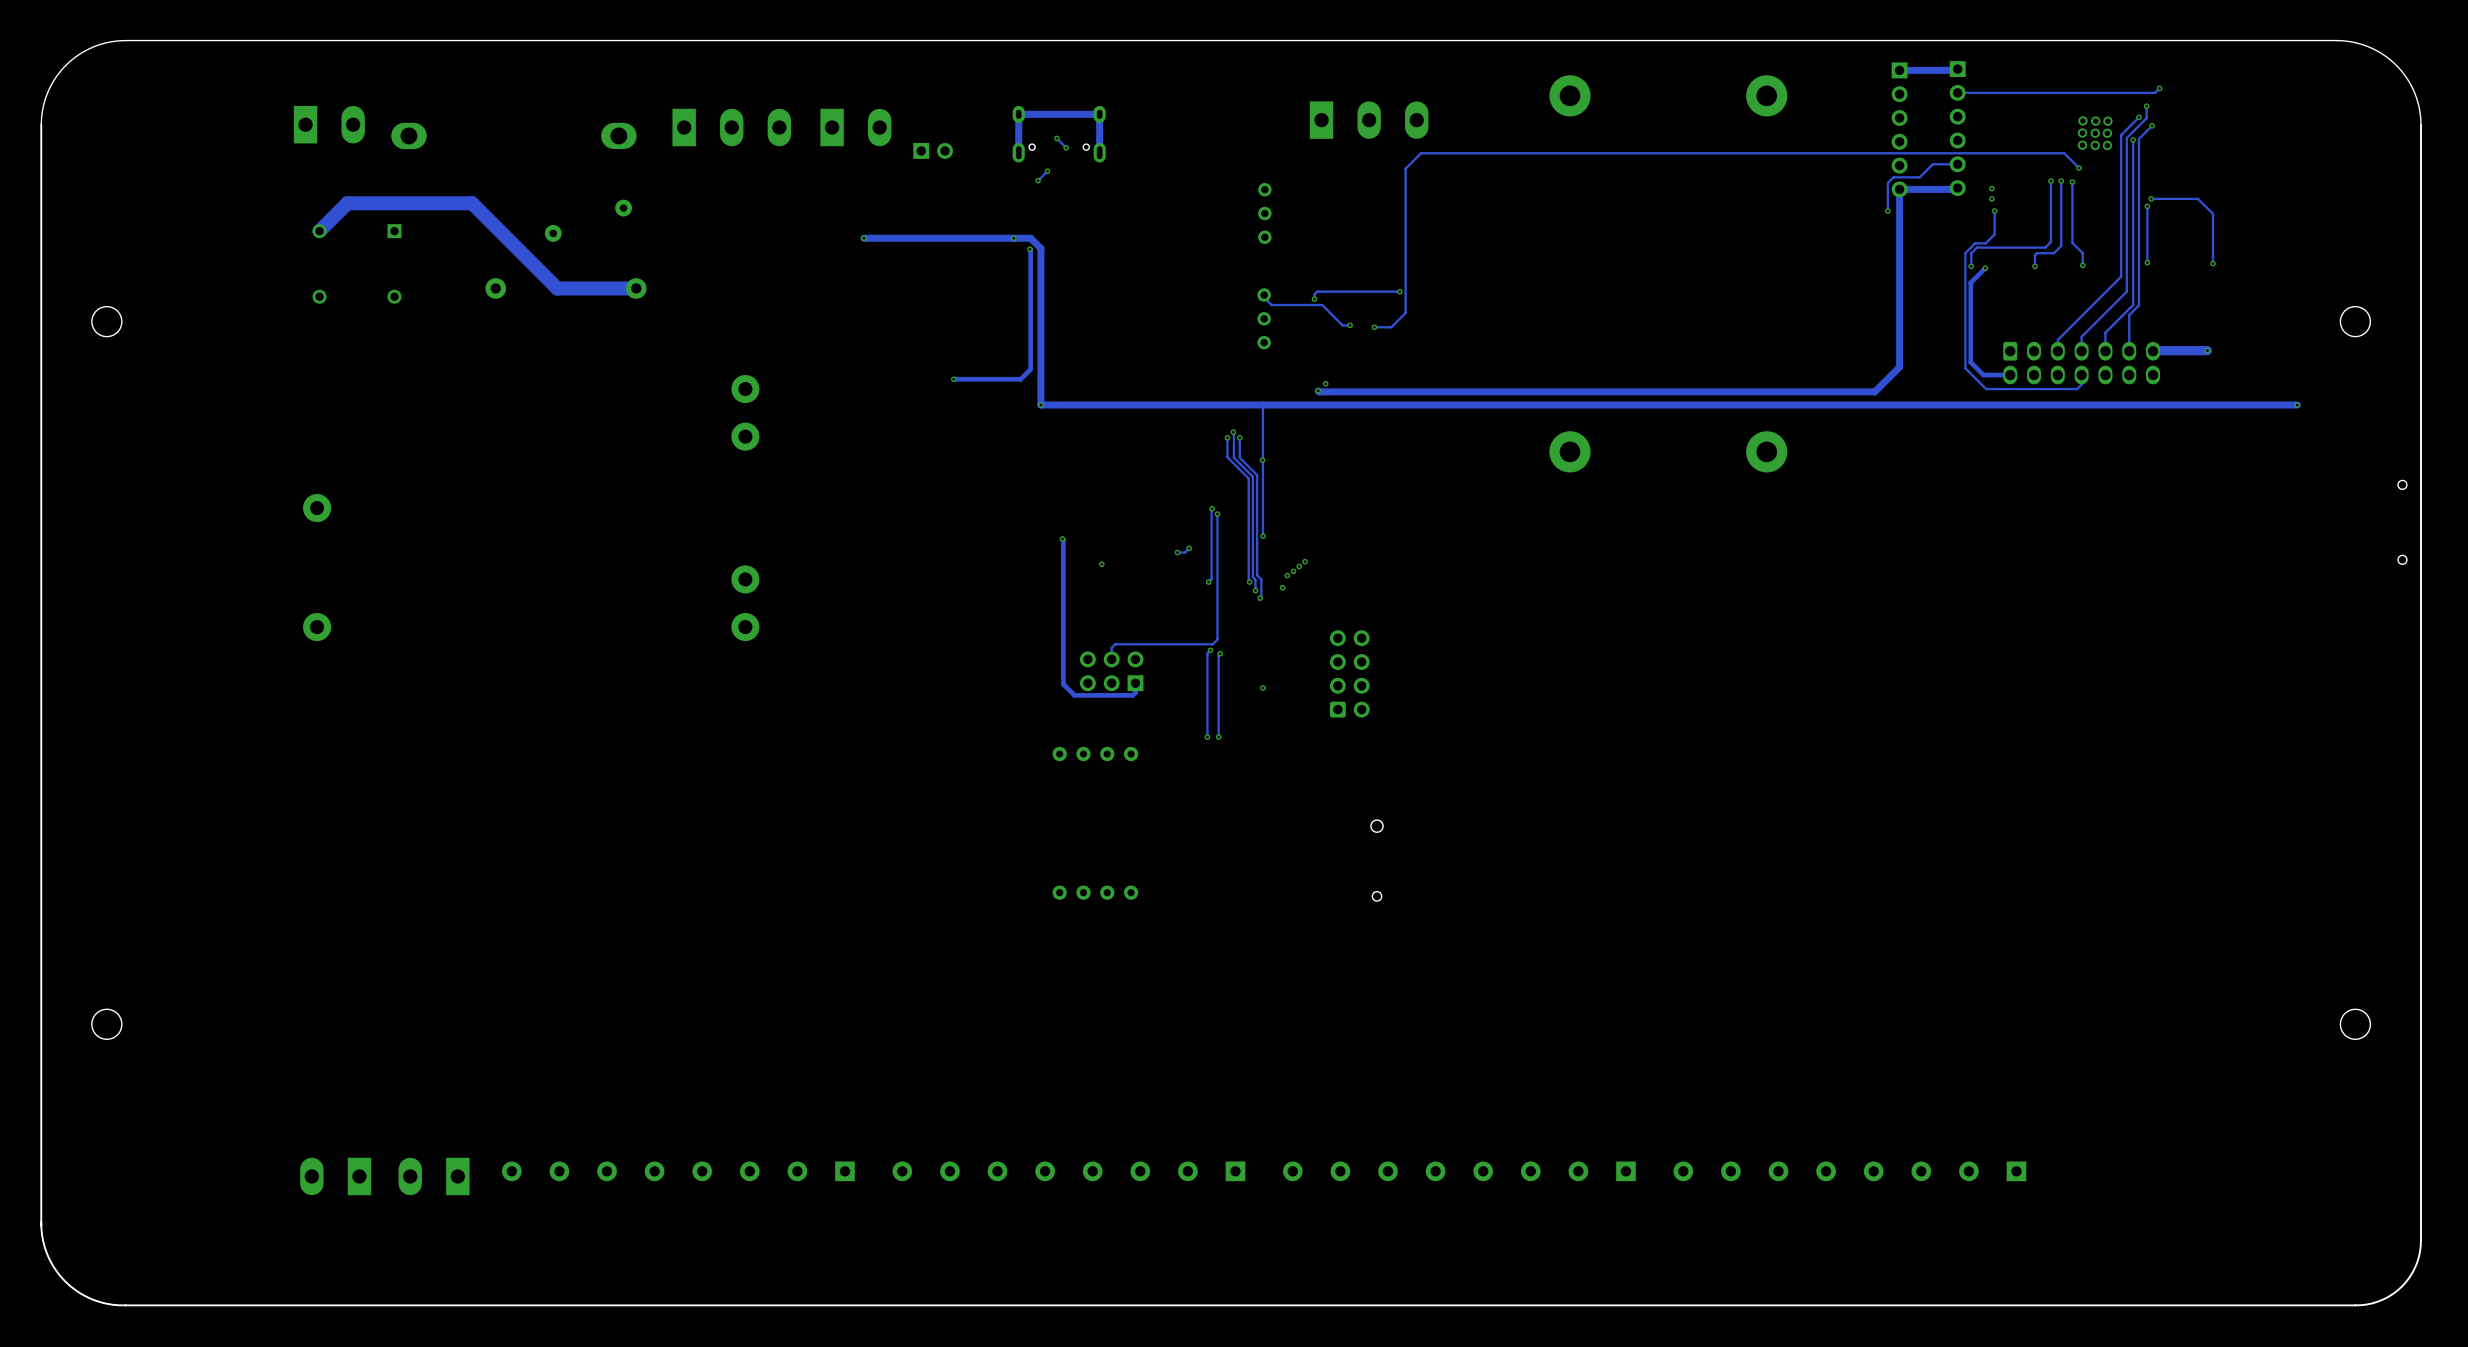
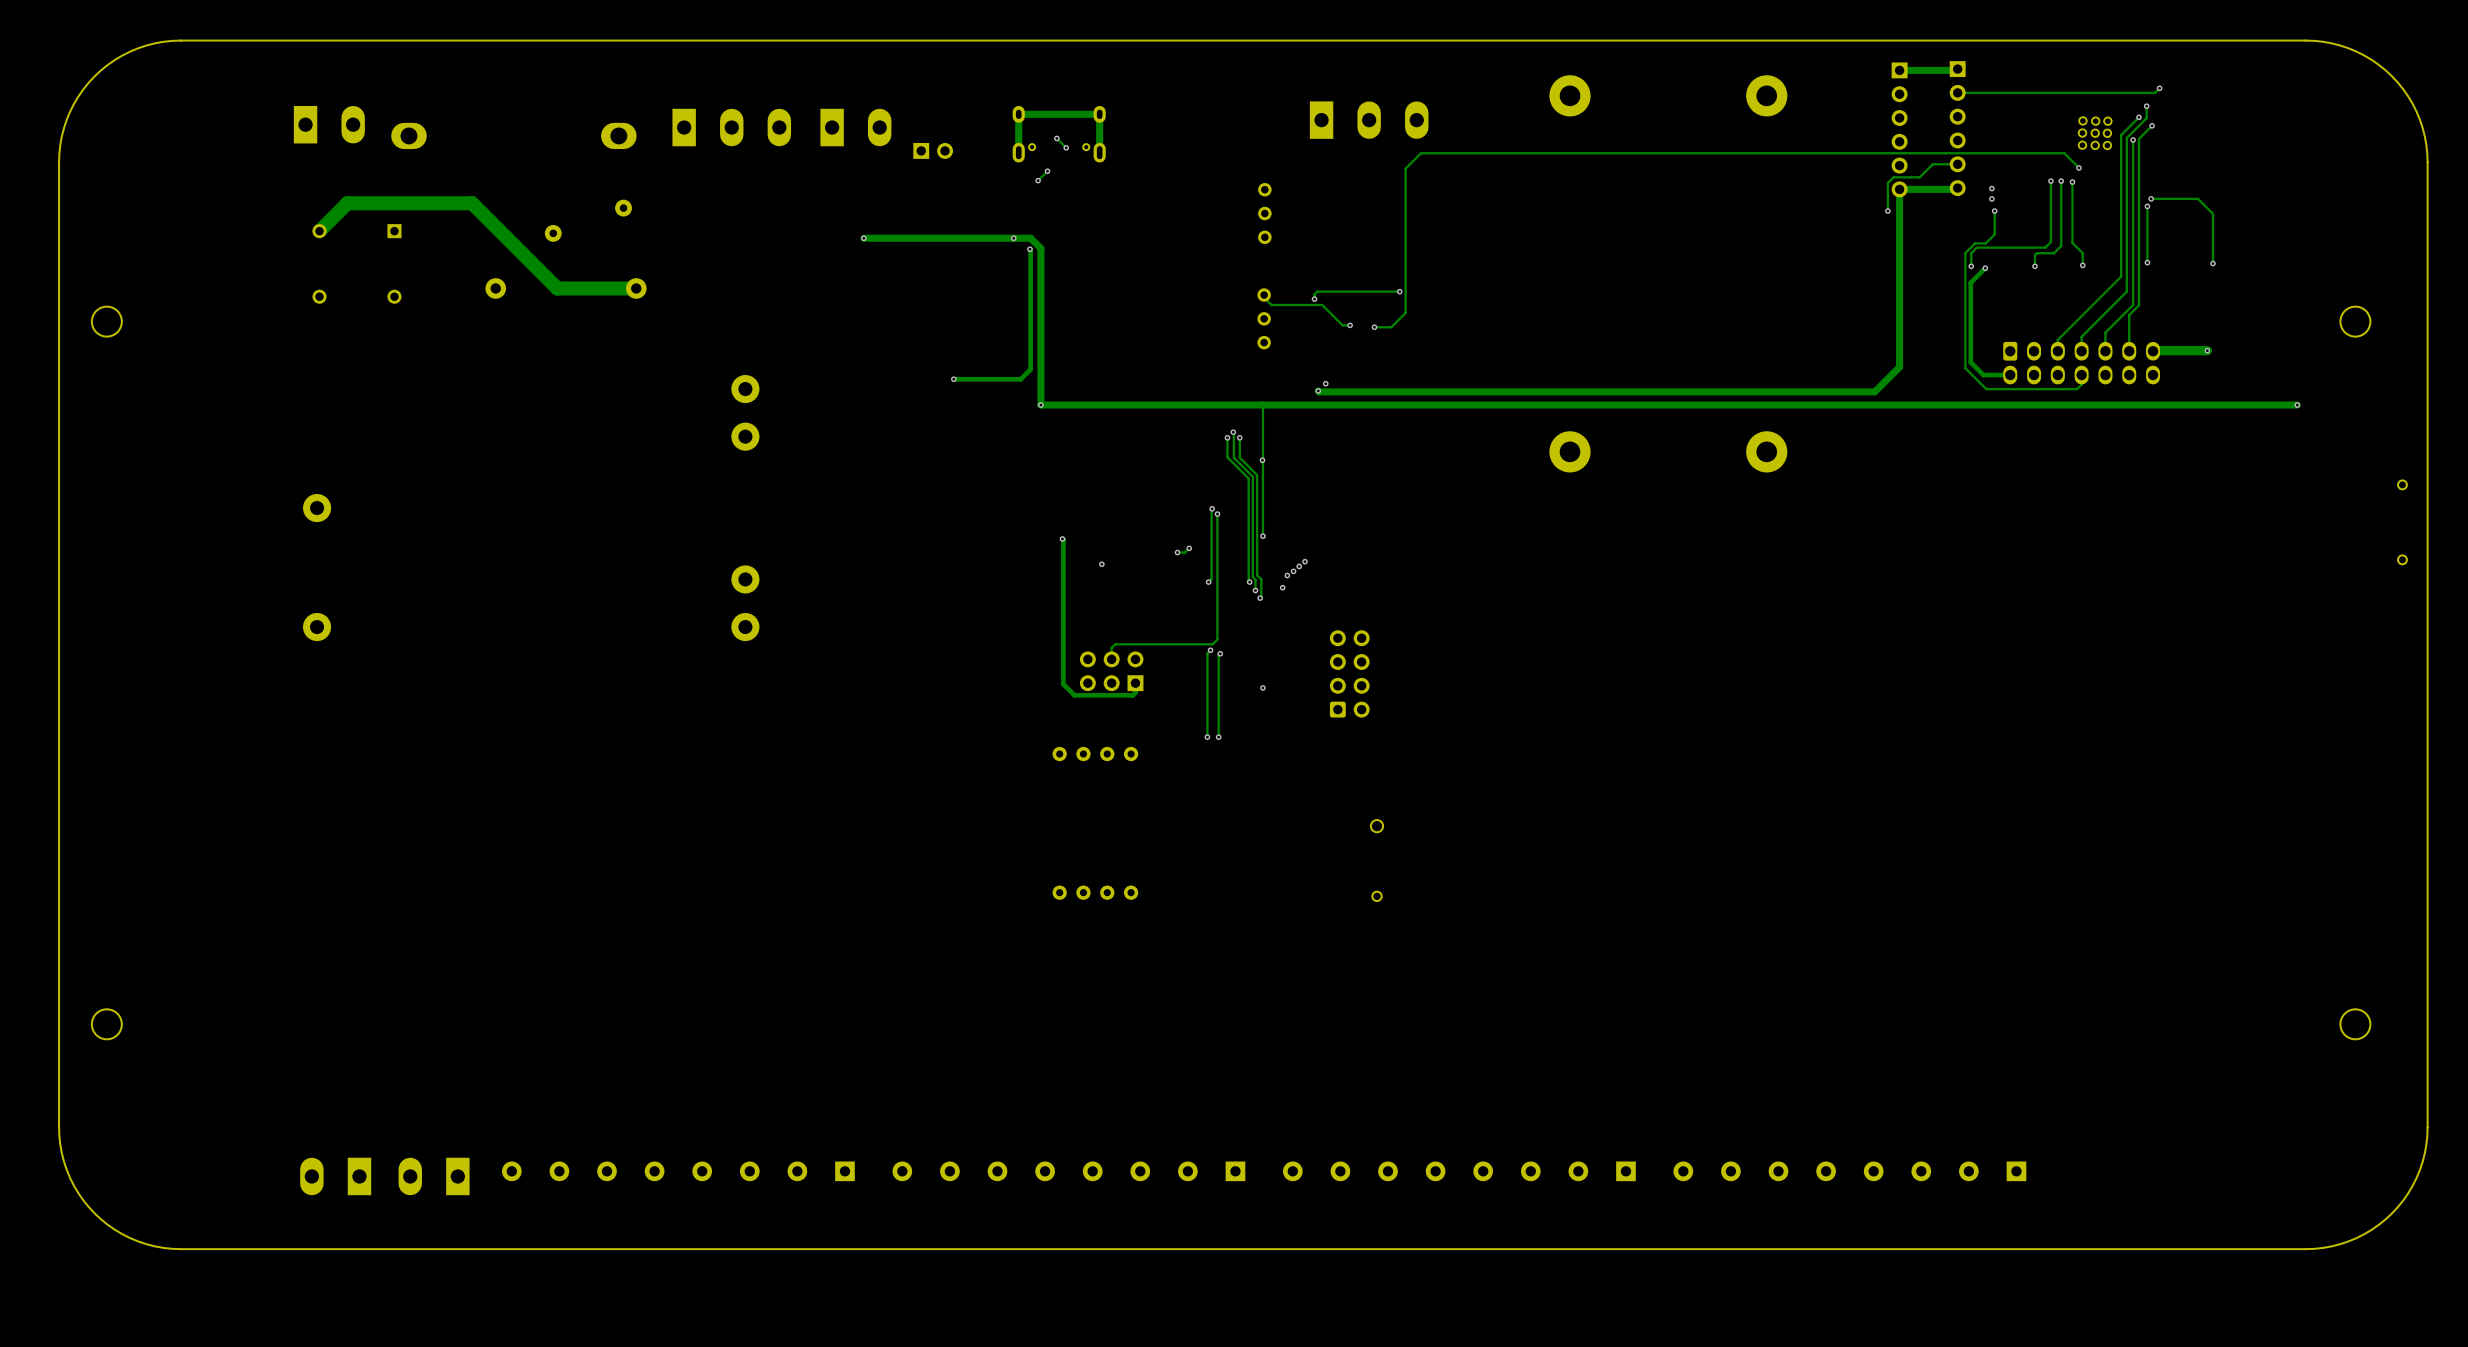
board edge: (180, 40) (118, 40) (99, 44) (87, 49) (70, 60) (57, 75) (45, 98) (41, 118) (41, 1225) -> none
board edge: (2305, 40) (2356, 42) (2374, 49) (2386, 56) (2400, 70) (2411, 86) (2416, 98) (2420, 118) (2420, 1239) -> (2305, 40) (2331, 43) (2348, 48) (2371, 59) (2391, 76) (2408, 96) (2419, 119) (2426, 145) (2427, 162) (2426, 1144) (2422, 1161) (2412, 1185) (2403, 1200) (2385, 1219) (2364, 1234) (2348, 1241) (2323, 1247) (2305, 1249) (180, 1249) (154, 1246) (122, 1234) (94, 1213) (78, 1193) (64, 1161) (59, 1136) (59, 153) (64, 128) (70, 111) (78, 96) (94, 76) (115, 59) (138, 48) (154, 43) (180, 40)
board edge: (41, 1222) (42, 1235) (47, 1254) (57, 1271) (65, 1281) (75, 1290) (93, 1299) (118, 1305) (2355, 1305) -> none
board edge: (2420, 1240) (2417, 1262) (2409, 1277) (2401, 1286) (2388, 1296) (2377, 1301) (2355, 1305) -> none

